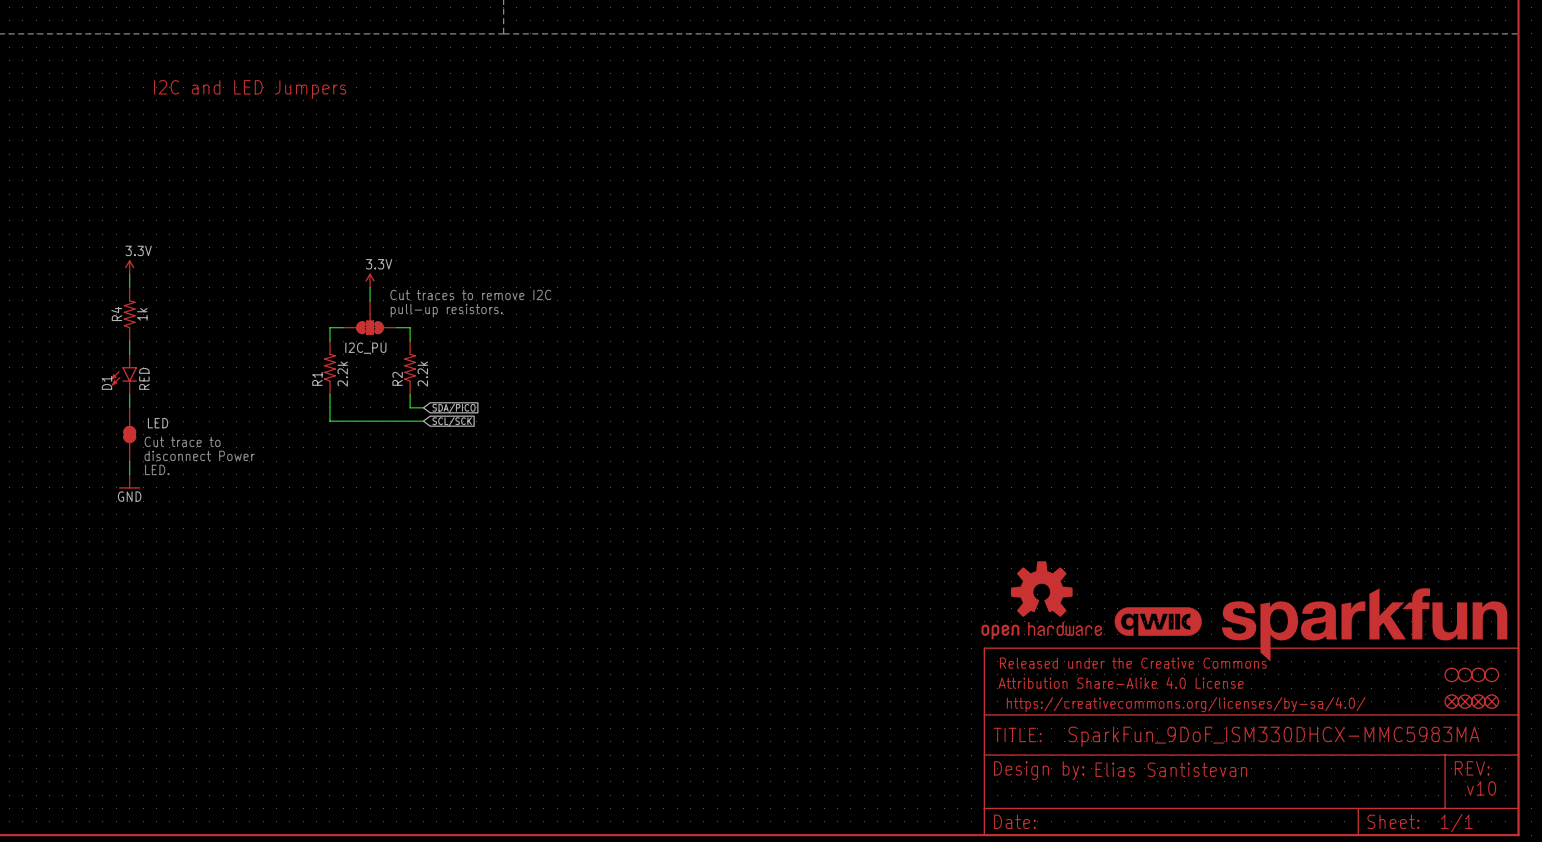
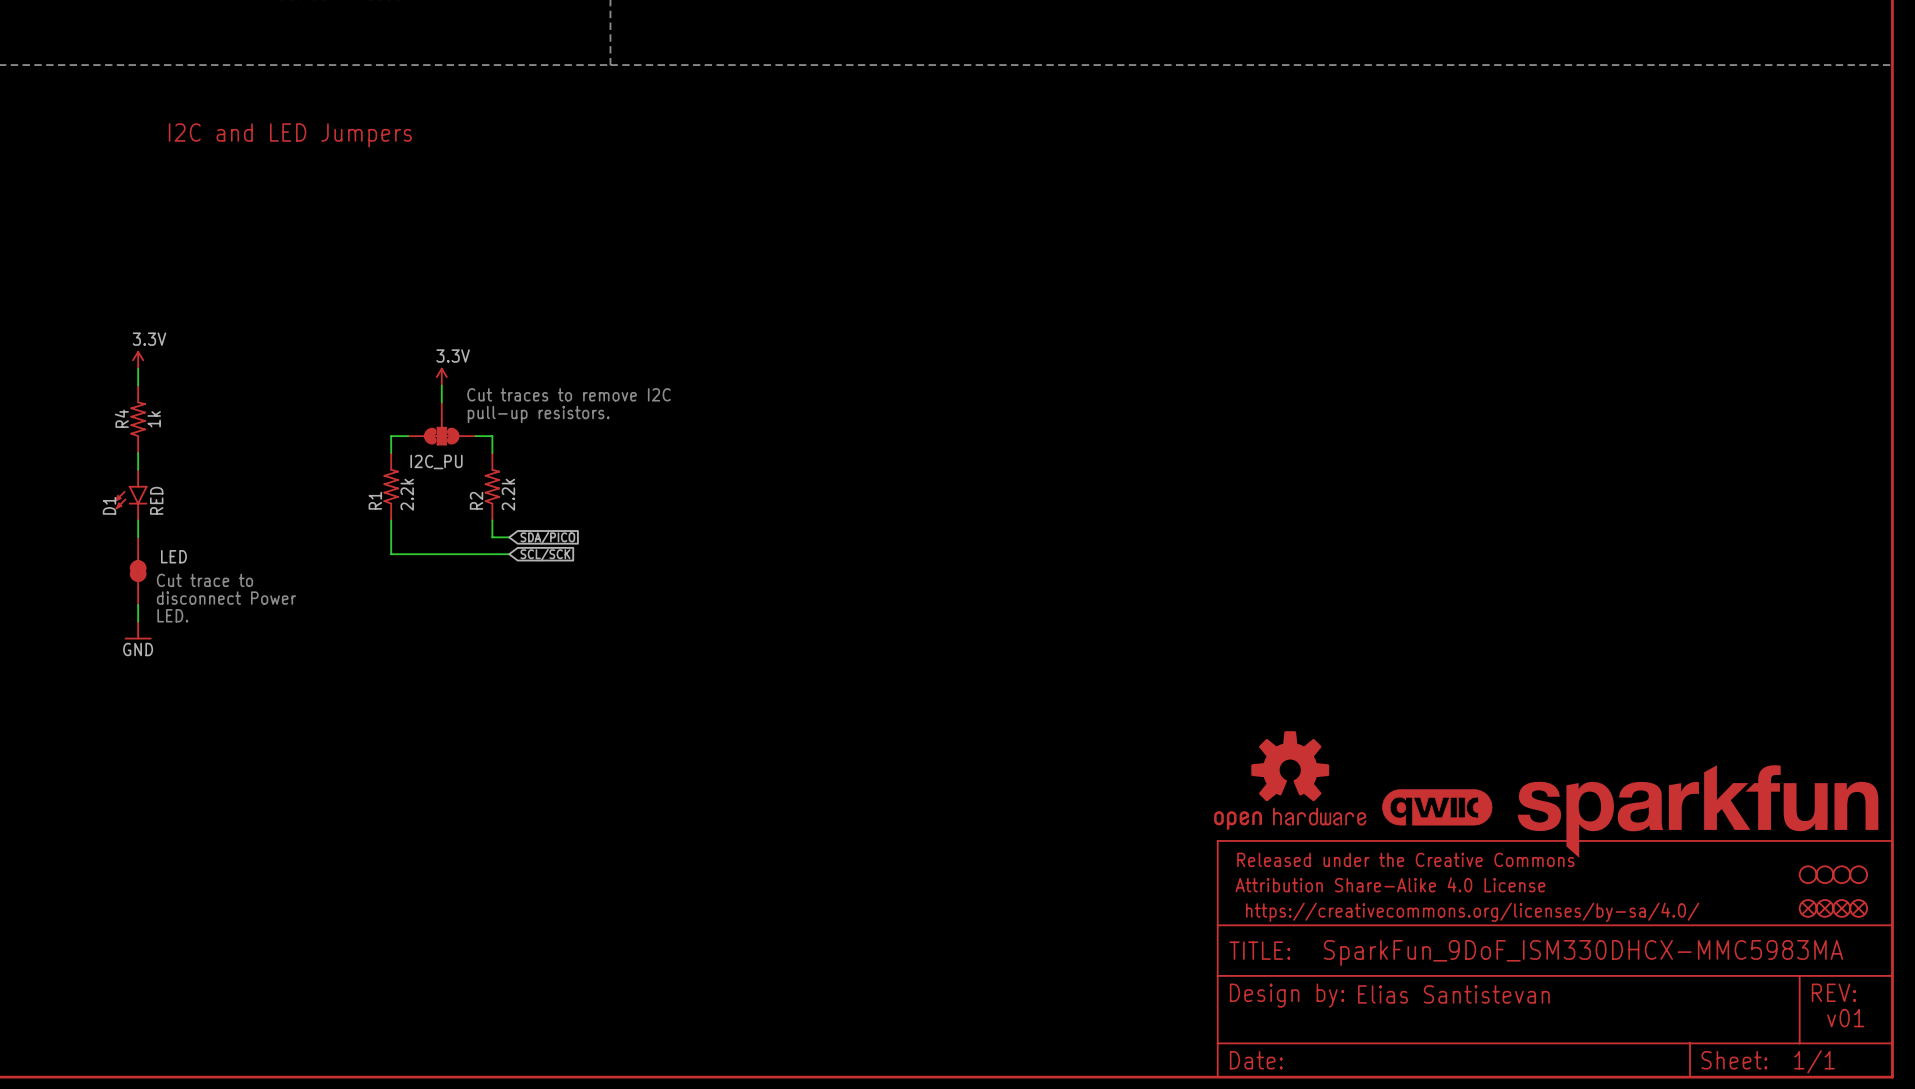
text: v10 (1481, 788) -> v01 (1845, 1018)

